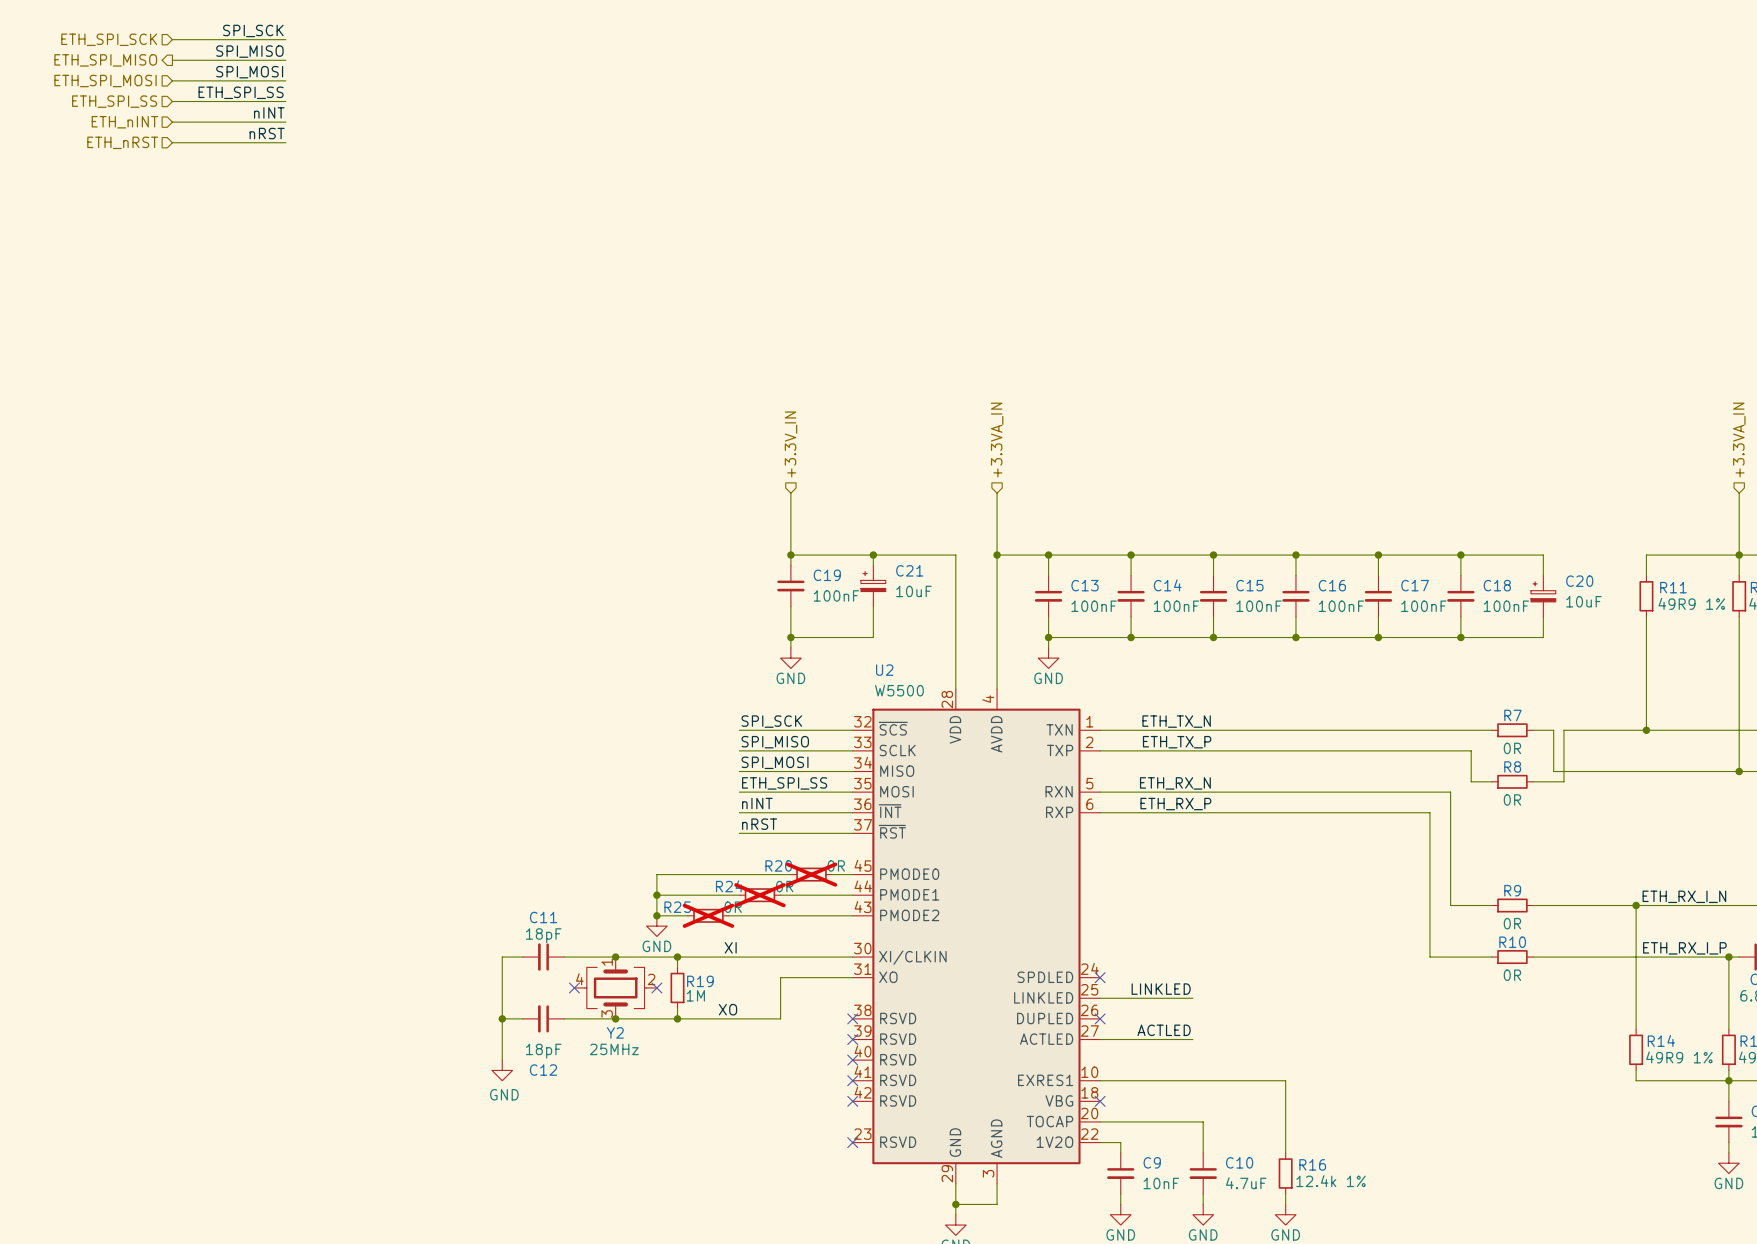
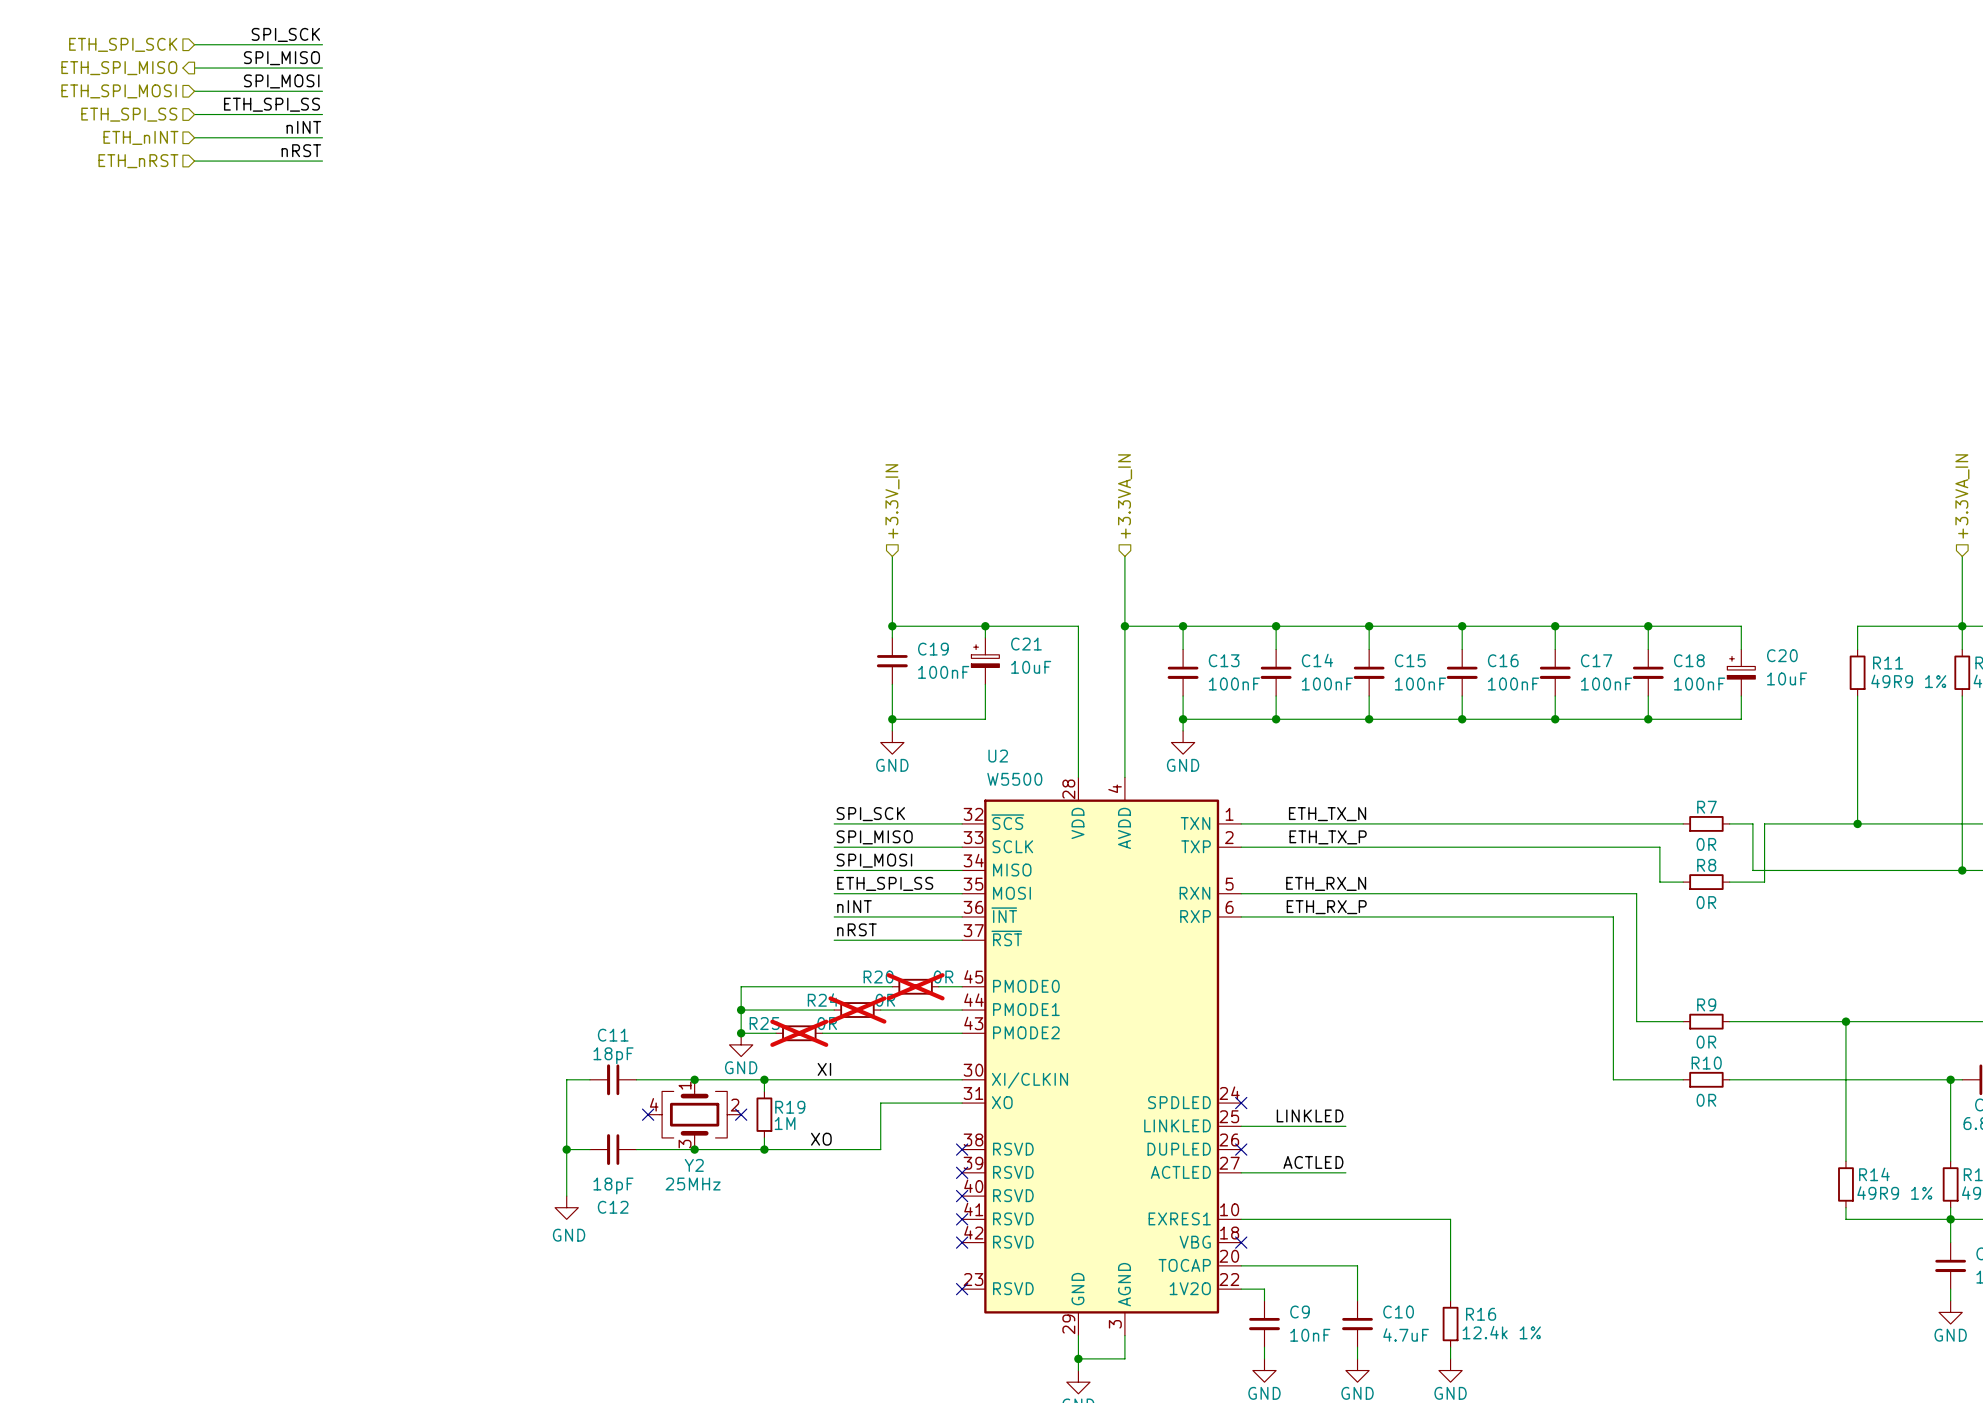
label: ETH_RX_I_N (1684, 896) -> none
label: ETH_RX_I_P (1684, 948) -> none

